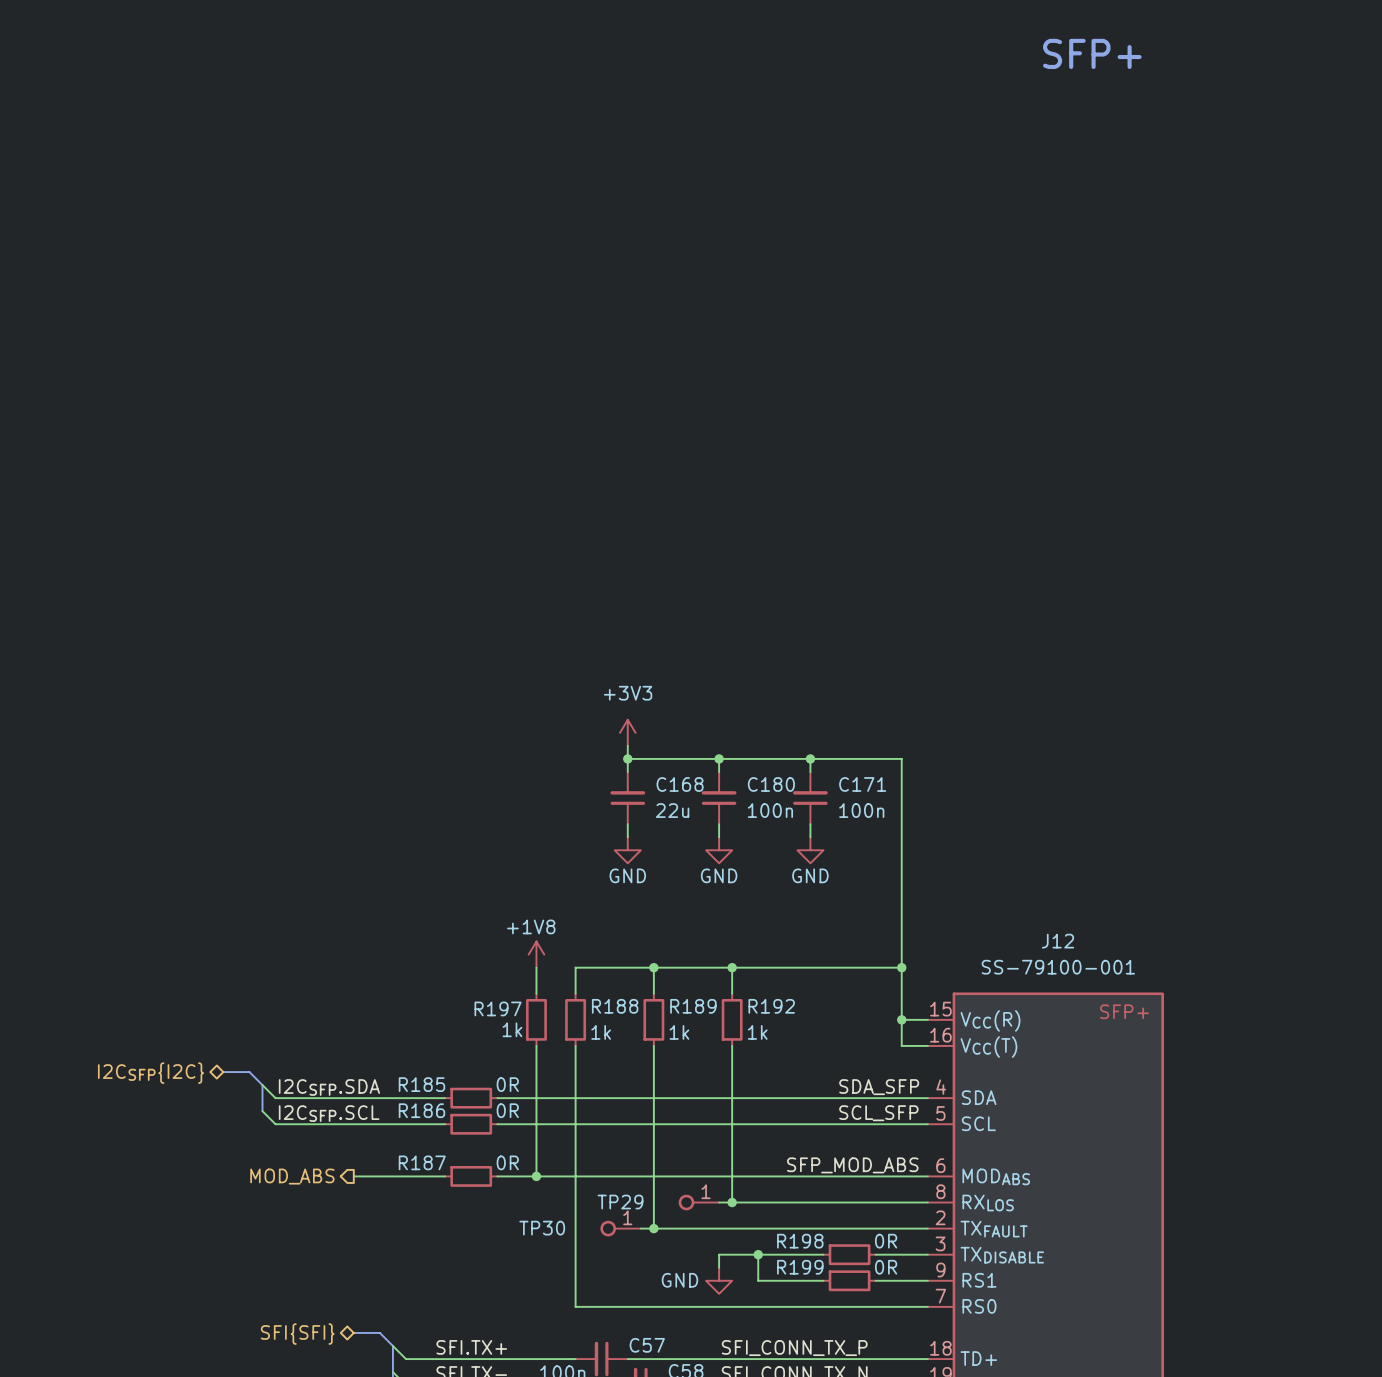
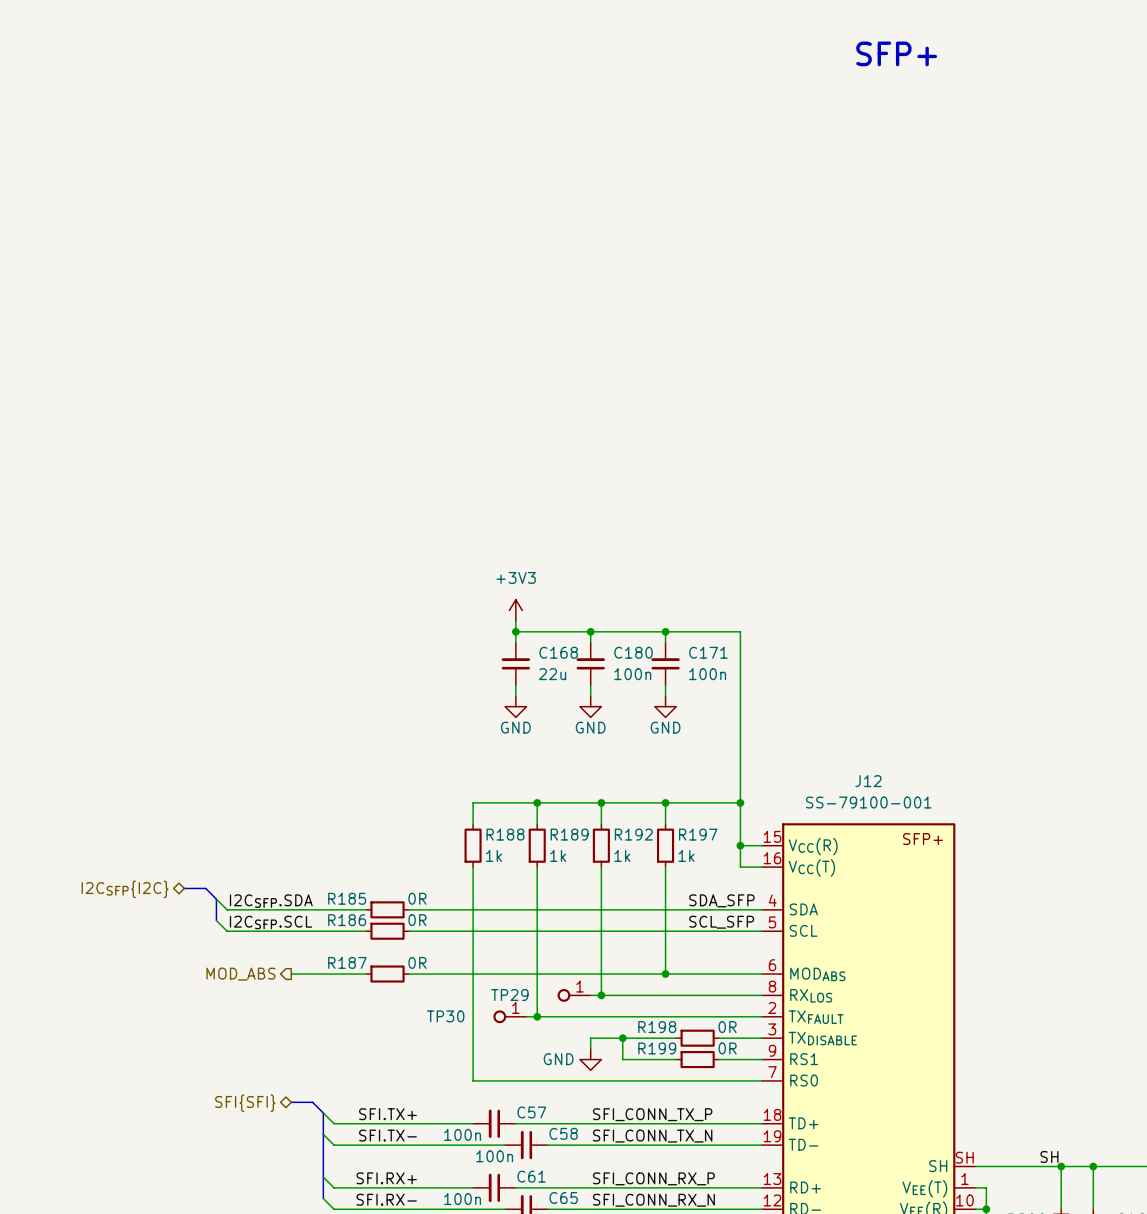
power symbol: +1V8 (536, 954) -> none
wire: (536, 967) (536, 993) -> none
wire: none -> (665, 802) (665, 824)
junction: none -> (665, 802)
R197 name position: R197 (498, 1008) -> R197 (698, 834)
R197 position: (536, 1019) -> (665, 845)
R197 text position: 1k (512, 1029) -> 1k (686, 855)
wire: (536, 1045) (536, 1176) -> none
wire: none -> (665, 867) (665, 974)
label: SFP_MOD_ABS (852, 1165) -> none
junction: (536, 1176) -> none
junction: none -> (665, 974)

